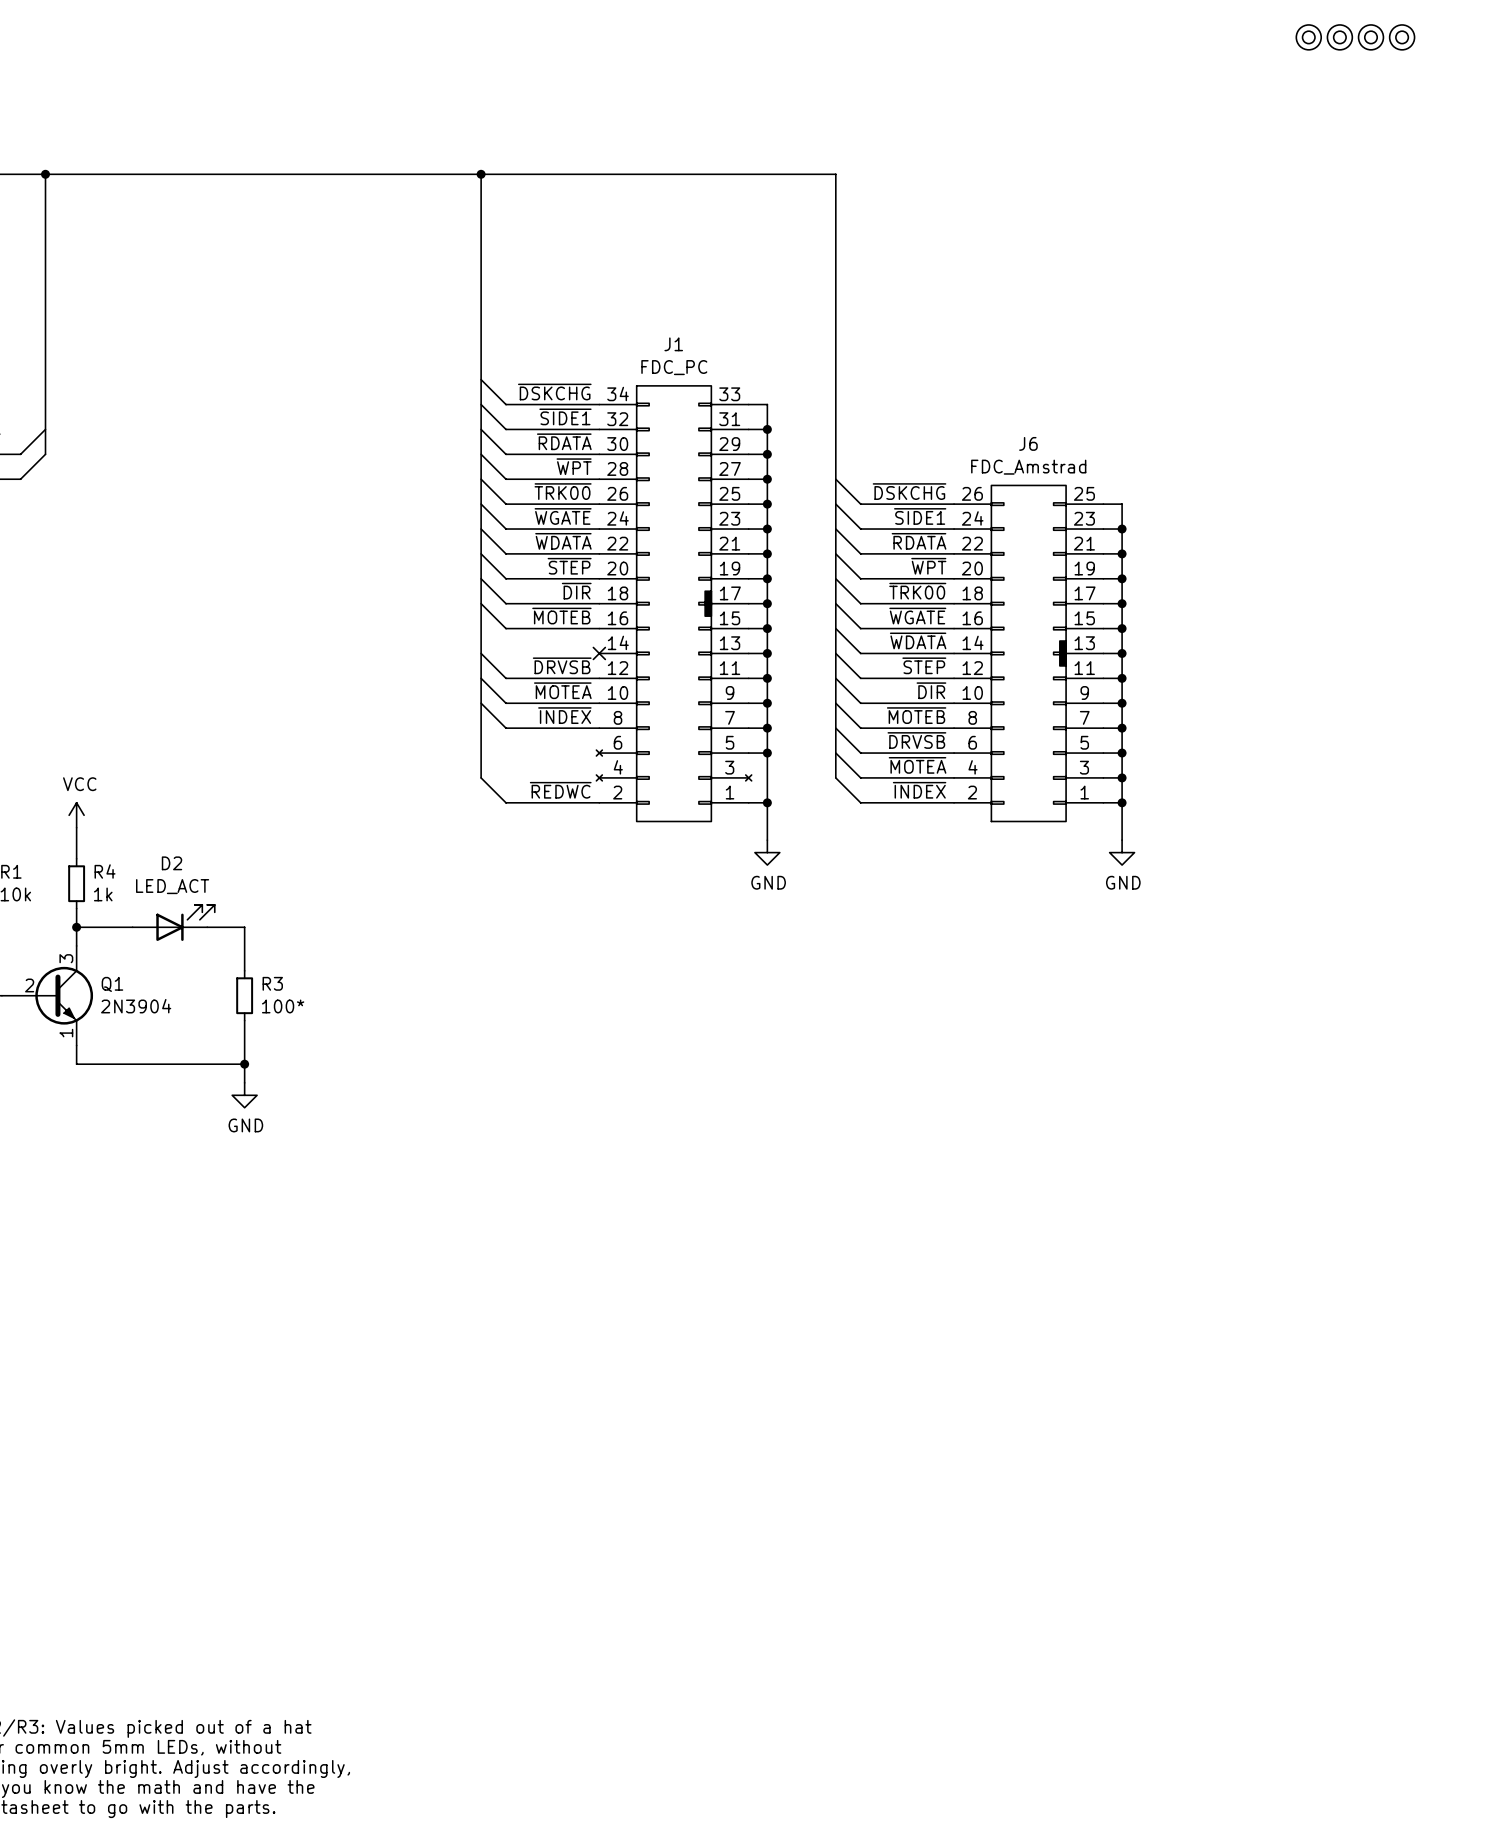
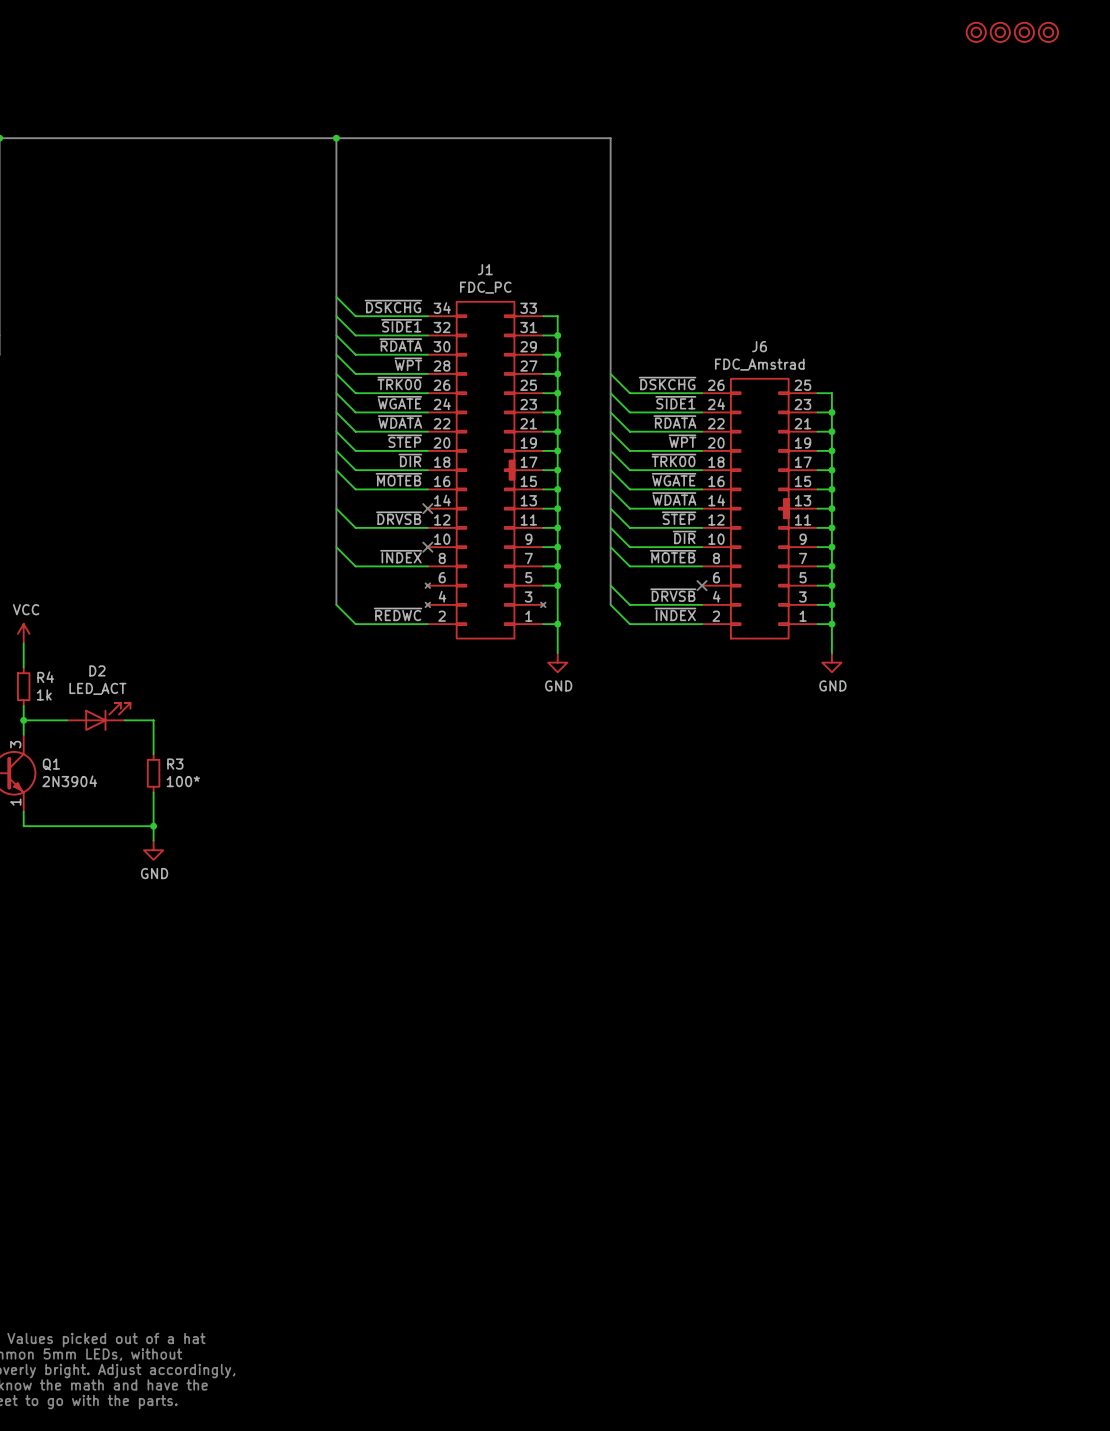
wire: (481, 678) (506, 703) (599, 703) -> none
label: ~{MOTEA} (562, 690) -> none
no-connect mark: none -> (427, 547)
wire: (835, 728) (860, 753) (954, 753) -> none
label: ~{DRVSB} (916, 740) -> none
no-connect mark: none -> (702, 585)
label: ~{MOTEA} (917, 765) -> ~{DRVSB} (673, 595)

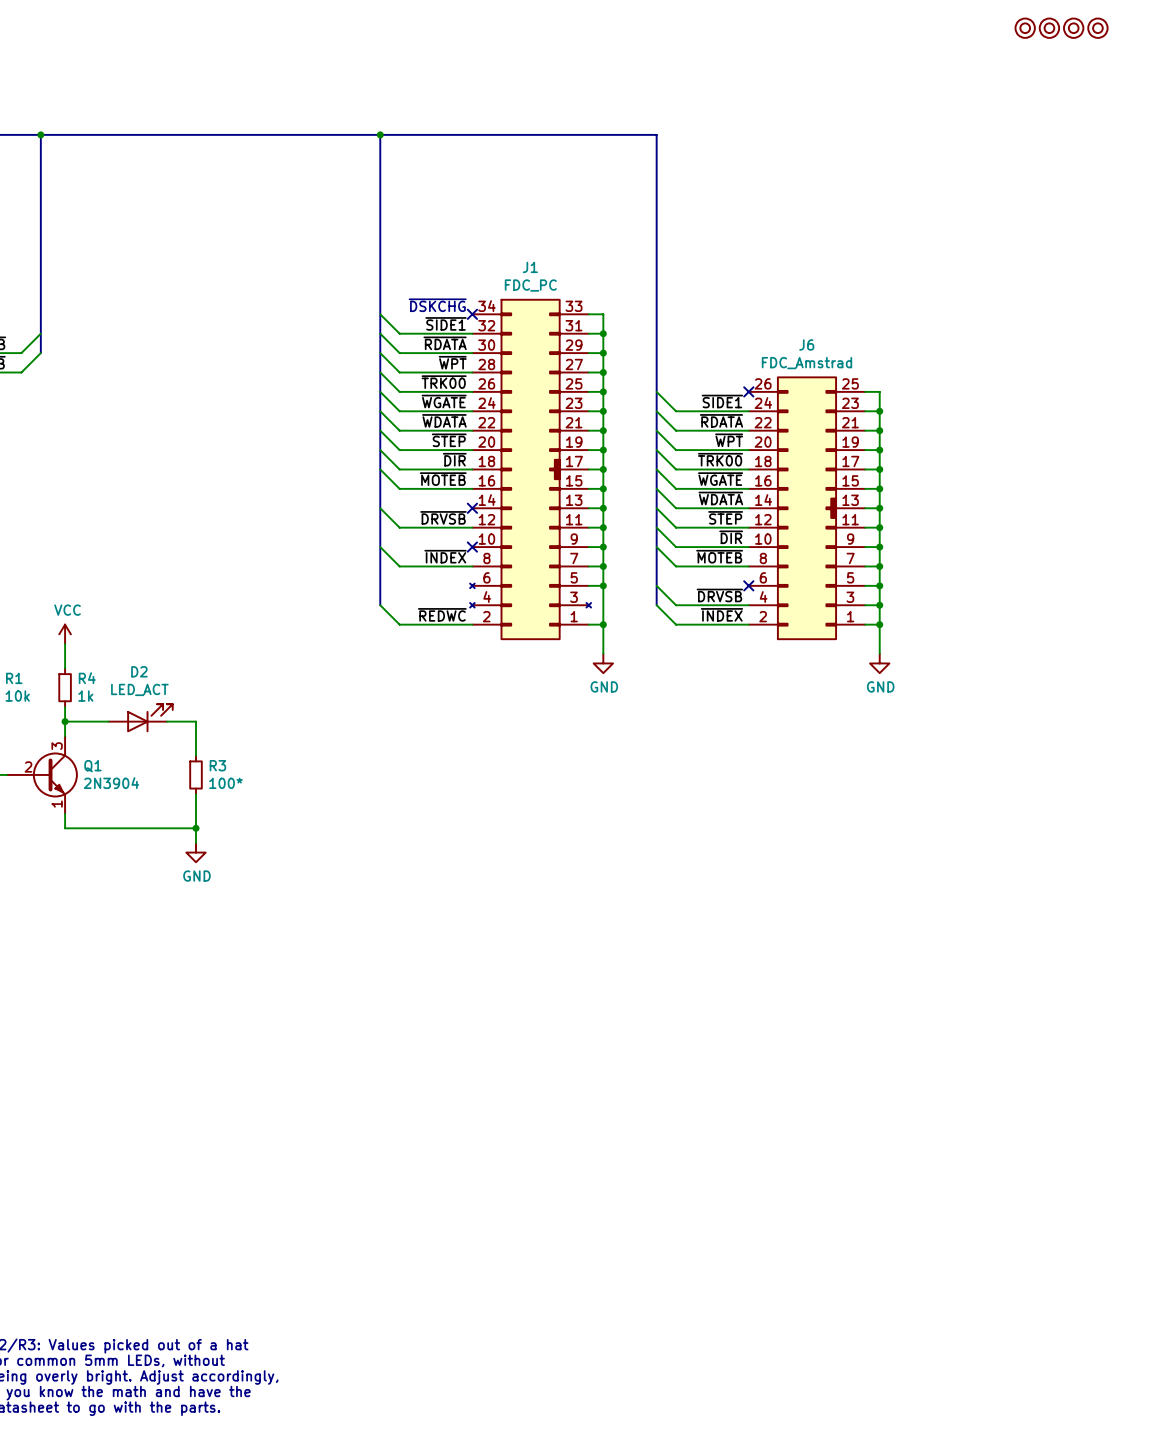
wire: (336, 296) (355, 316) (427, 316) -> none
label: ~{DSKCHG} (393, 306) -> none
text: none -> ~{DSKCHG} (437, 305)
no-connect mark: none -> (472, 314)
wire: (610, 373) (629, 393) (702, 393) -> none
label: ~{DSKCHG} (667, 383) -> none
no-connect mark: none -> (748, 391)

